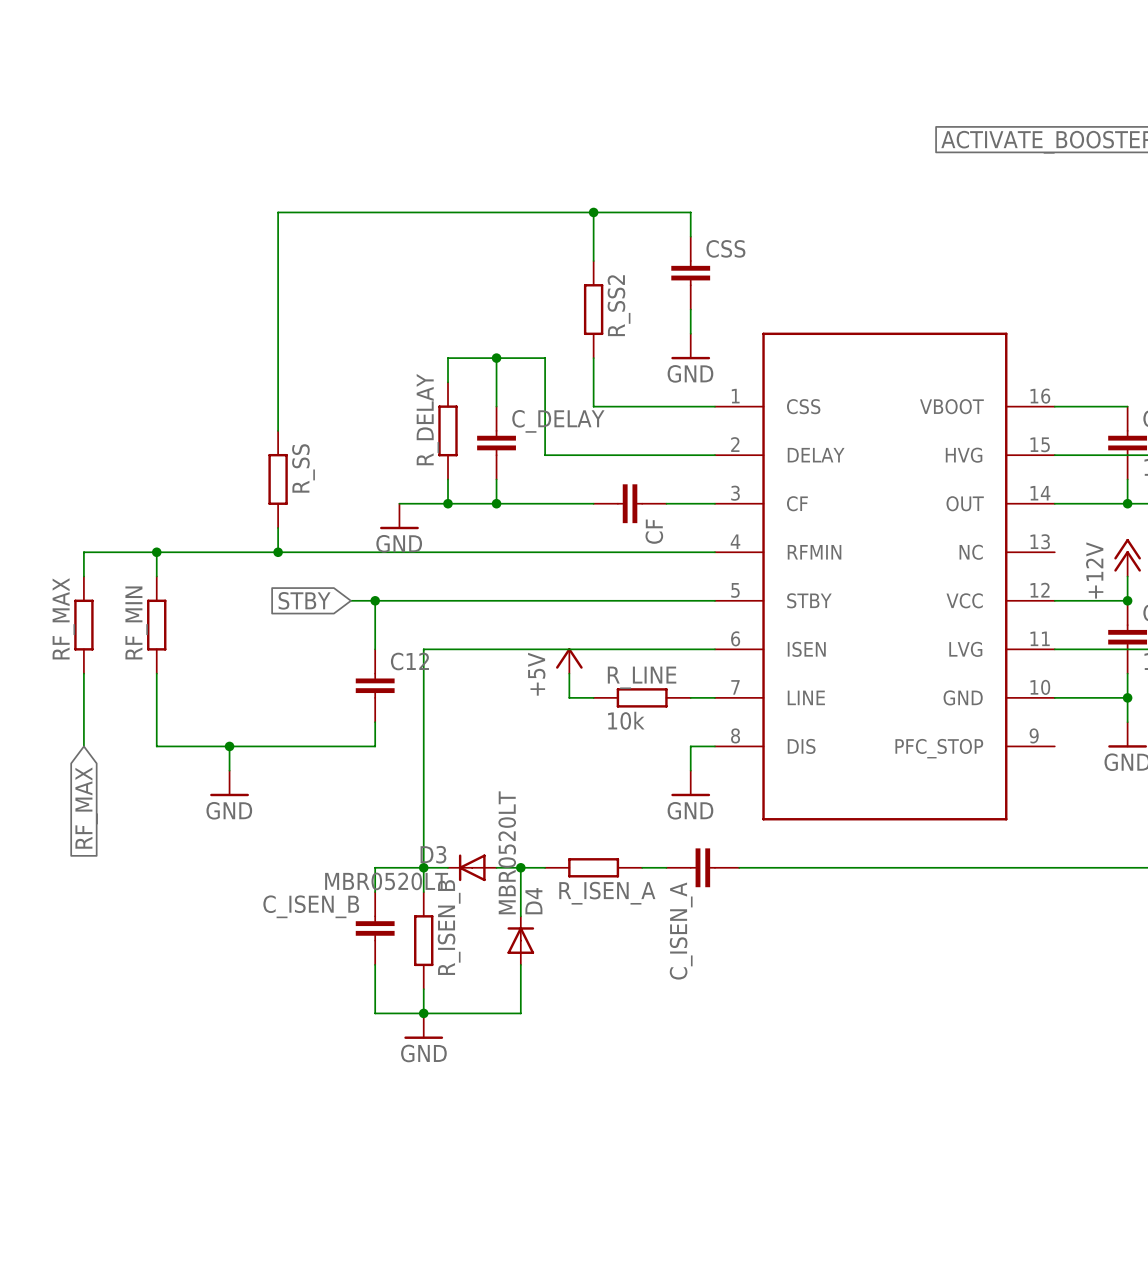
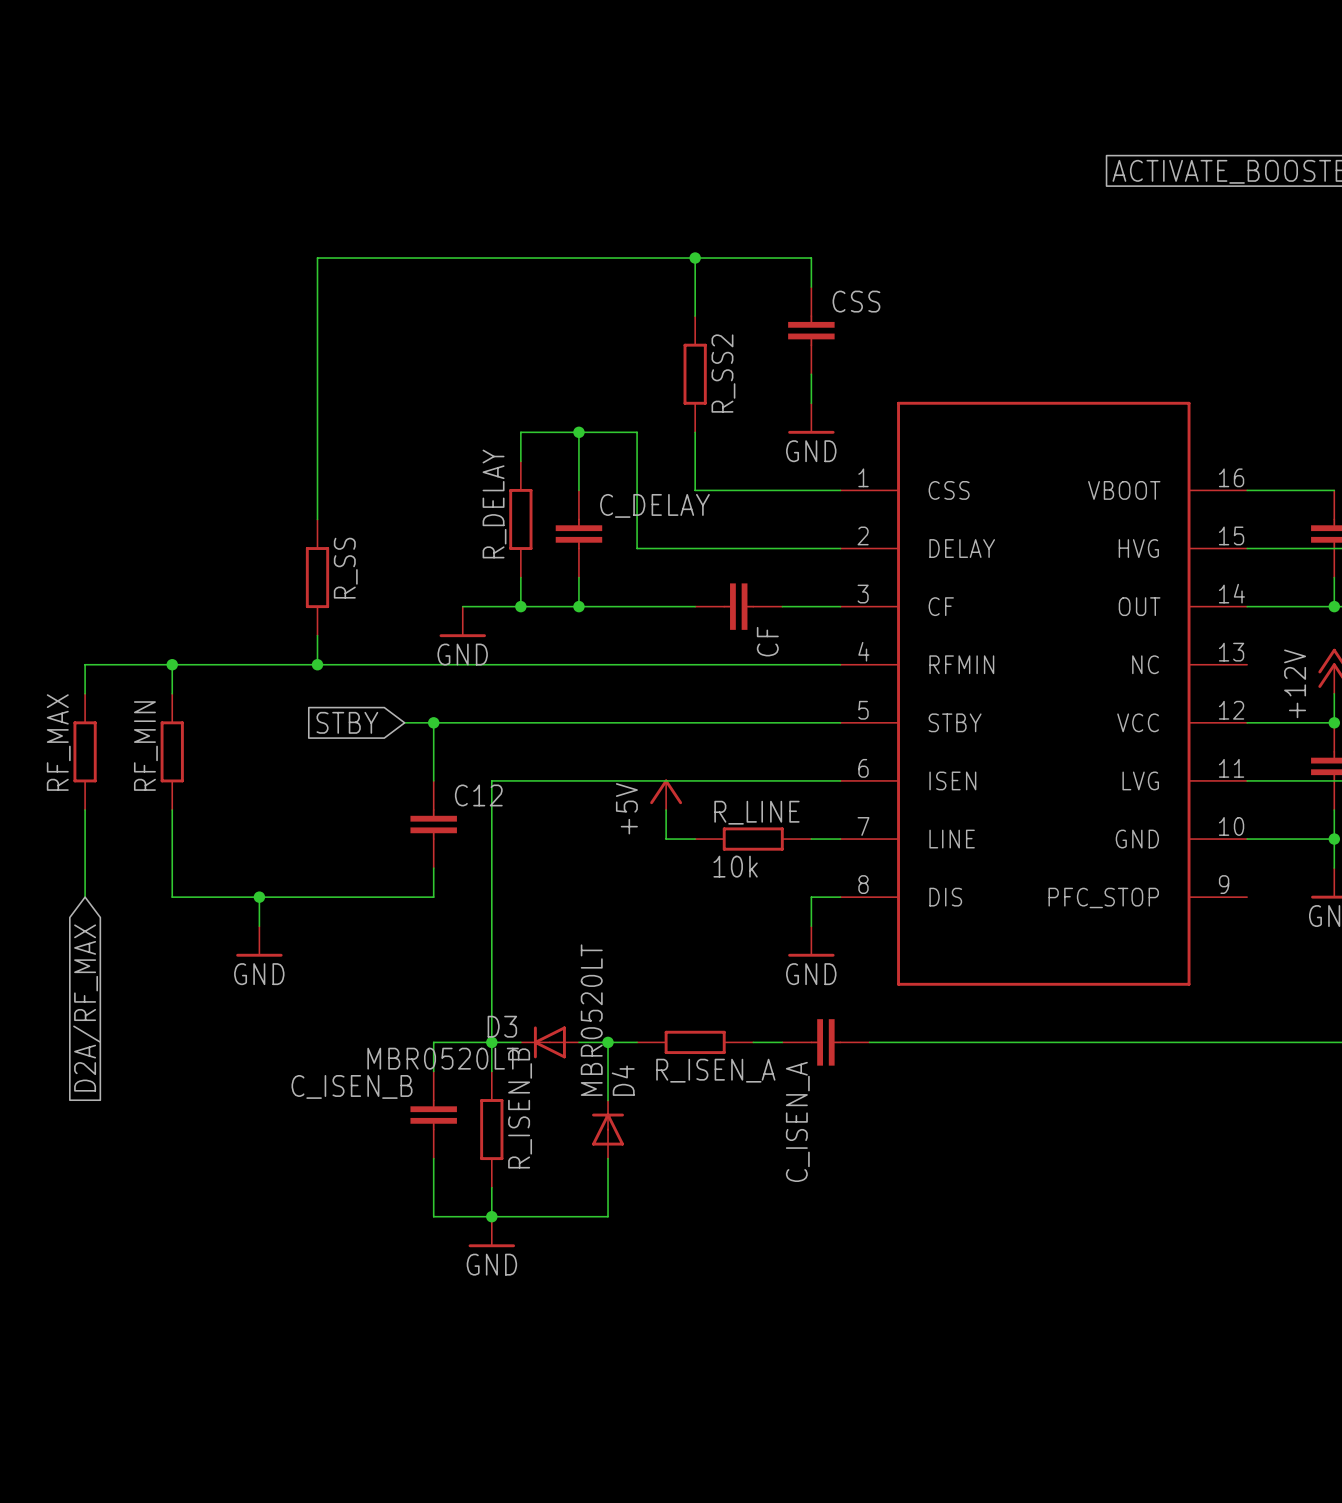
global label: RF_MAX (86, 808) -> D2A/RF_MAX (87, 1008)

